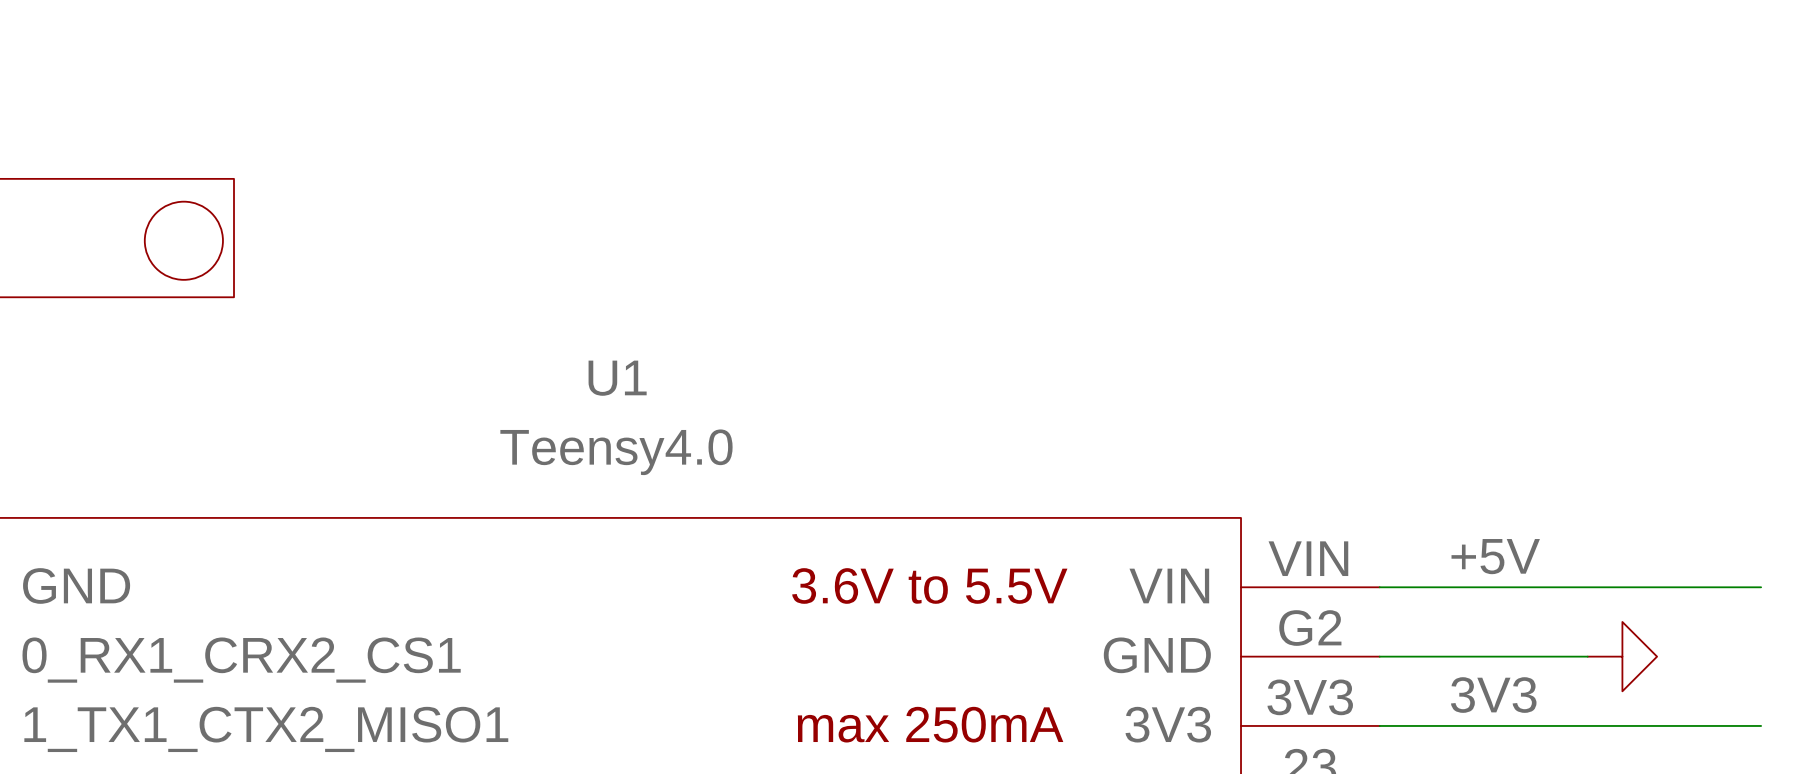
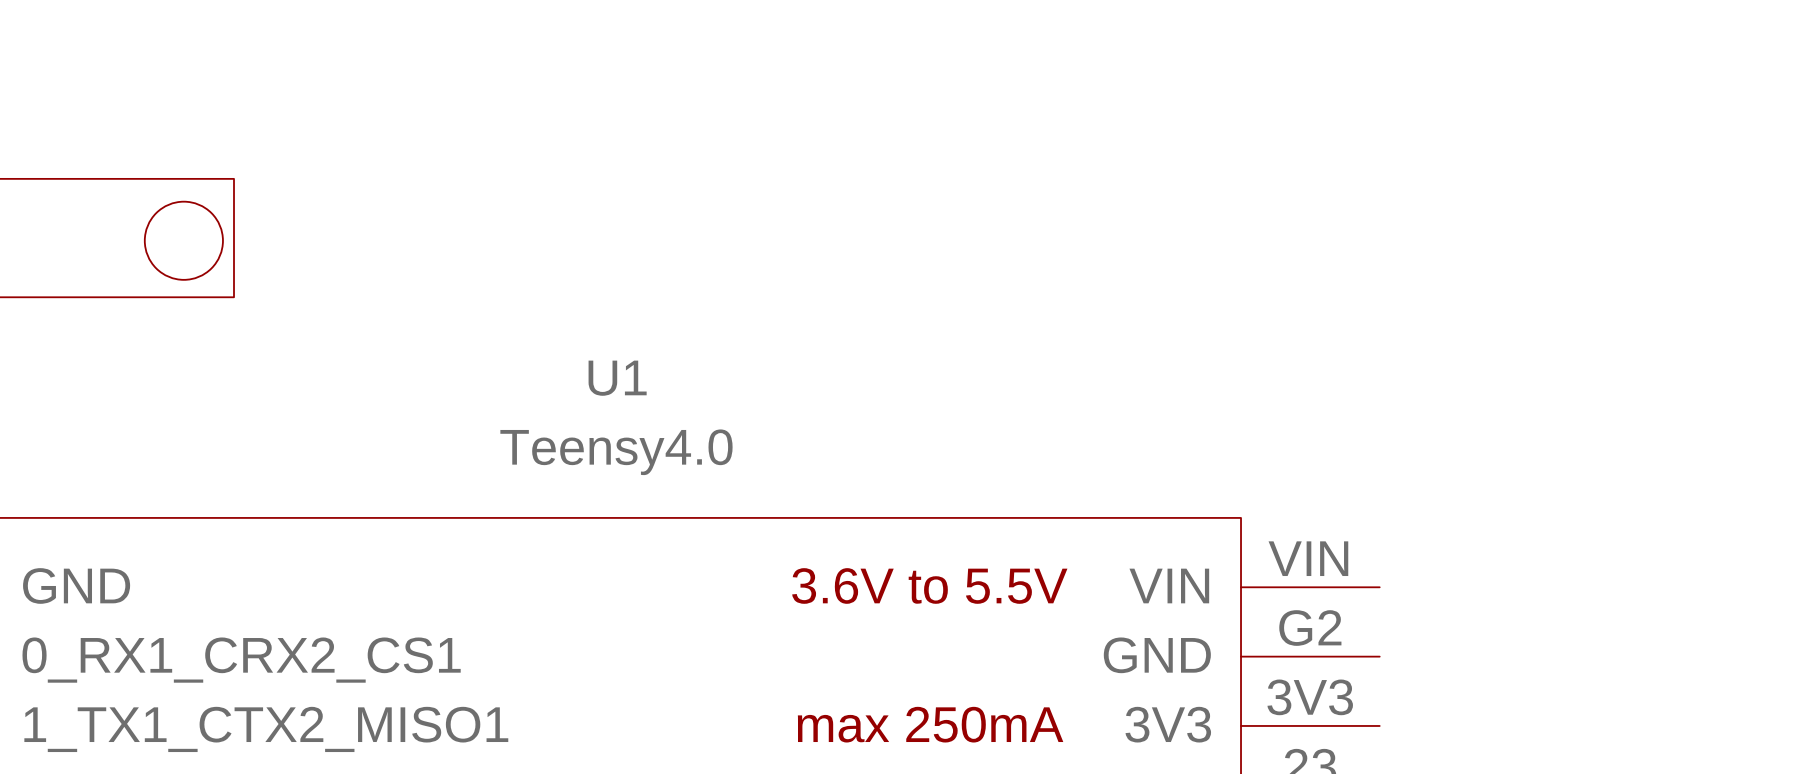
label: +5V (1495, 556) -> none
wire: (1379, 587) (1761, 587) -> none
wire: (1379, 656) (1587, 656) -> none
power symbol: (1622, 656) -> none
label: 3V3 (1493, 695) -> none
wire: (1379, 725) (1761, 725) -> none

